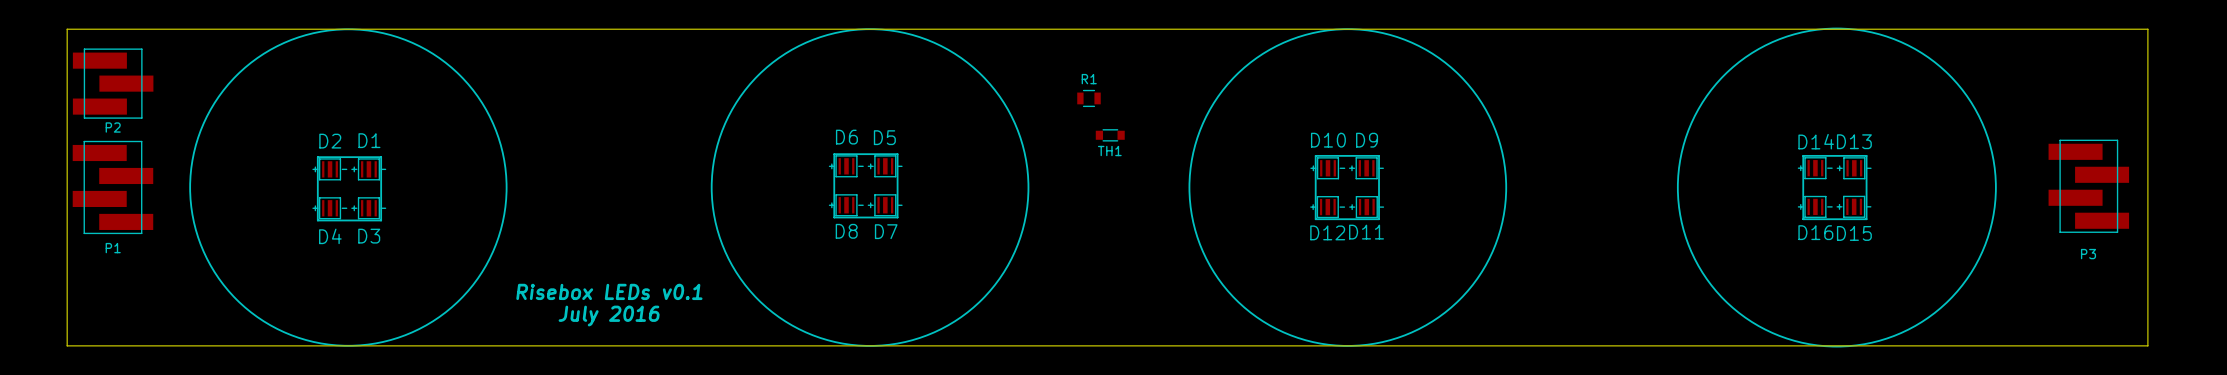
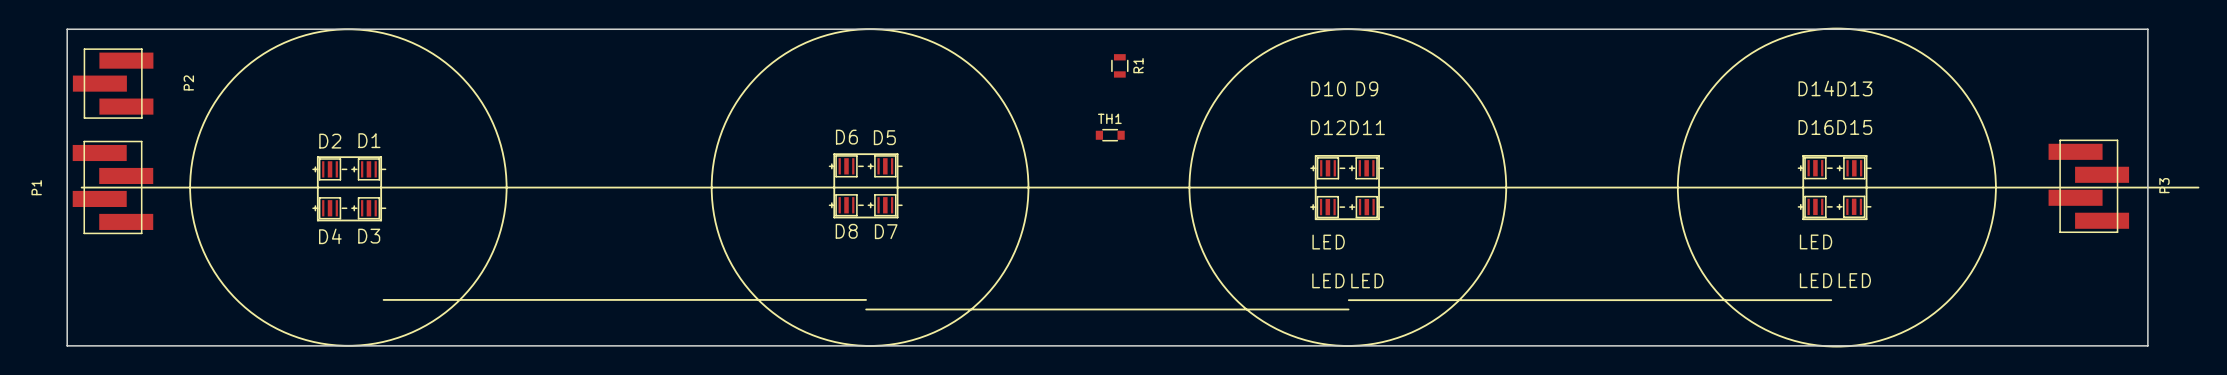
P2 rotation: 0° (113, 83) -> 180° (113, 83)
R1 rotation: 0° (1089, 98) -> 90° clockwise (1119, 65)
R1 position: (1089, 98) -> (1119, 65)
P2 name position: P2 (113, 127) -> P2 (188, 82)
TH1 rotation: 0° (1110, 135) -> 180° (1110, 135)
D10 name position: D10 (1328, 140) -> D10 (1328, 88)
D9 name position: D9 (1367, 140) -> D9 (1367, 88)
D14 name position: D14 (1816, 141) -> D14 (1816, 88)
D13 name position: D13 (1854, 141) -> D13 (1854, 88)
line: none -> (81, 187) (2198, 187)
D12 name position: D12 (1327, 232) -> D12 (1328, 127)
D11 name position: D11 (1366, 232) -> D11 (1367, 127)
D16 name position: D16 (1815, 232) -> D16 (1816, 127)
D15 name position: D15 (1854, 233) -> D15 (1854, 127)
D14 value: none -> LED (1816, 241)
D10 value: none -> LED (1328, 242)
P1 name rotation: 0° (113, 248) -> 90° counterclockwise (36, 187)
P1 name position: P1 (113, 248) -> P1 (36, 187)
P3 name rotation: 0° (2088, 254) -> 90° counterclockwise (2164, 185)
P3 name position: P3 (2088, 254) -> P3 (2164, 185)
D12 value: none -> LED (1328, 280)
D11 value: none -> LED (1367, 280)
D16 value: none -> LED (1816, 280)
D15 value: none -> LED (1854, 280)
text: Risebox LEDs v0.1 (609, 291) -> none
line: none -> (383, 299) (866, 299)
line: none -> (1348, 300) (1831, 300)
line: none -> (866, 309) (1348, 309)
text: July 2016 (609, 316) -> none

